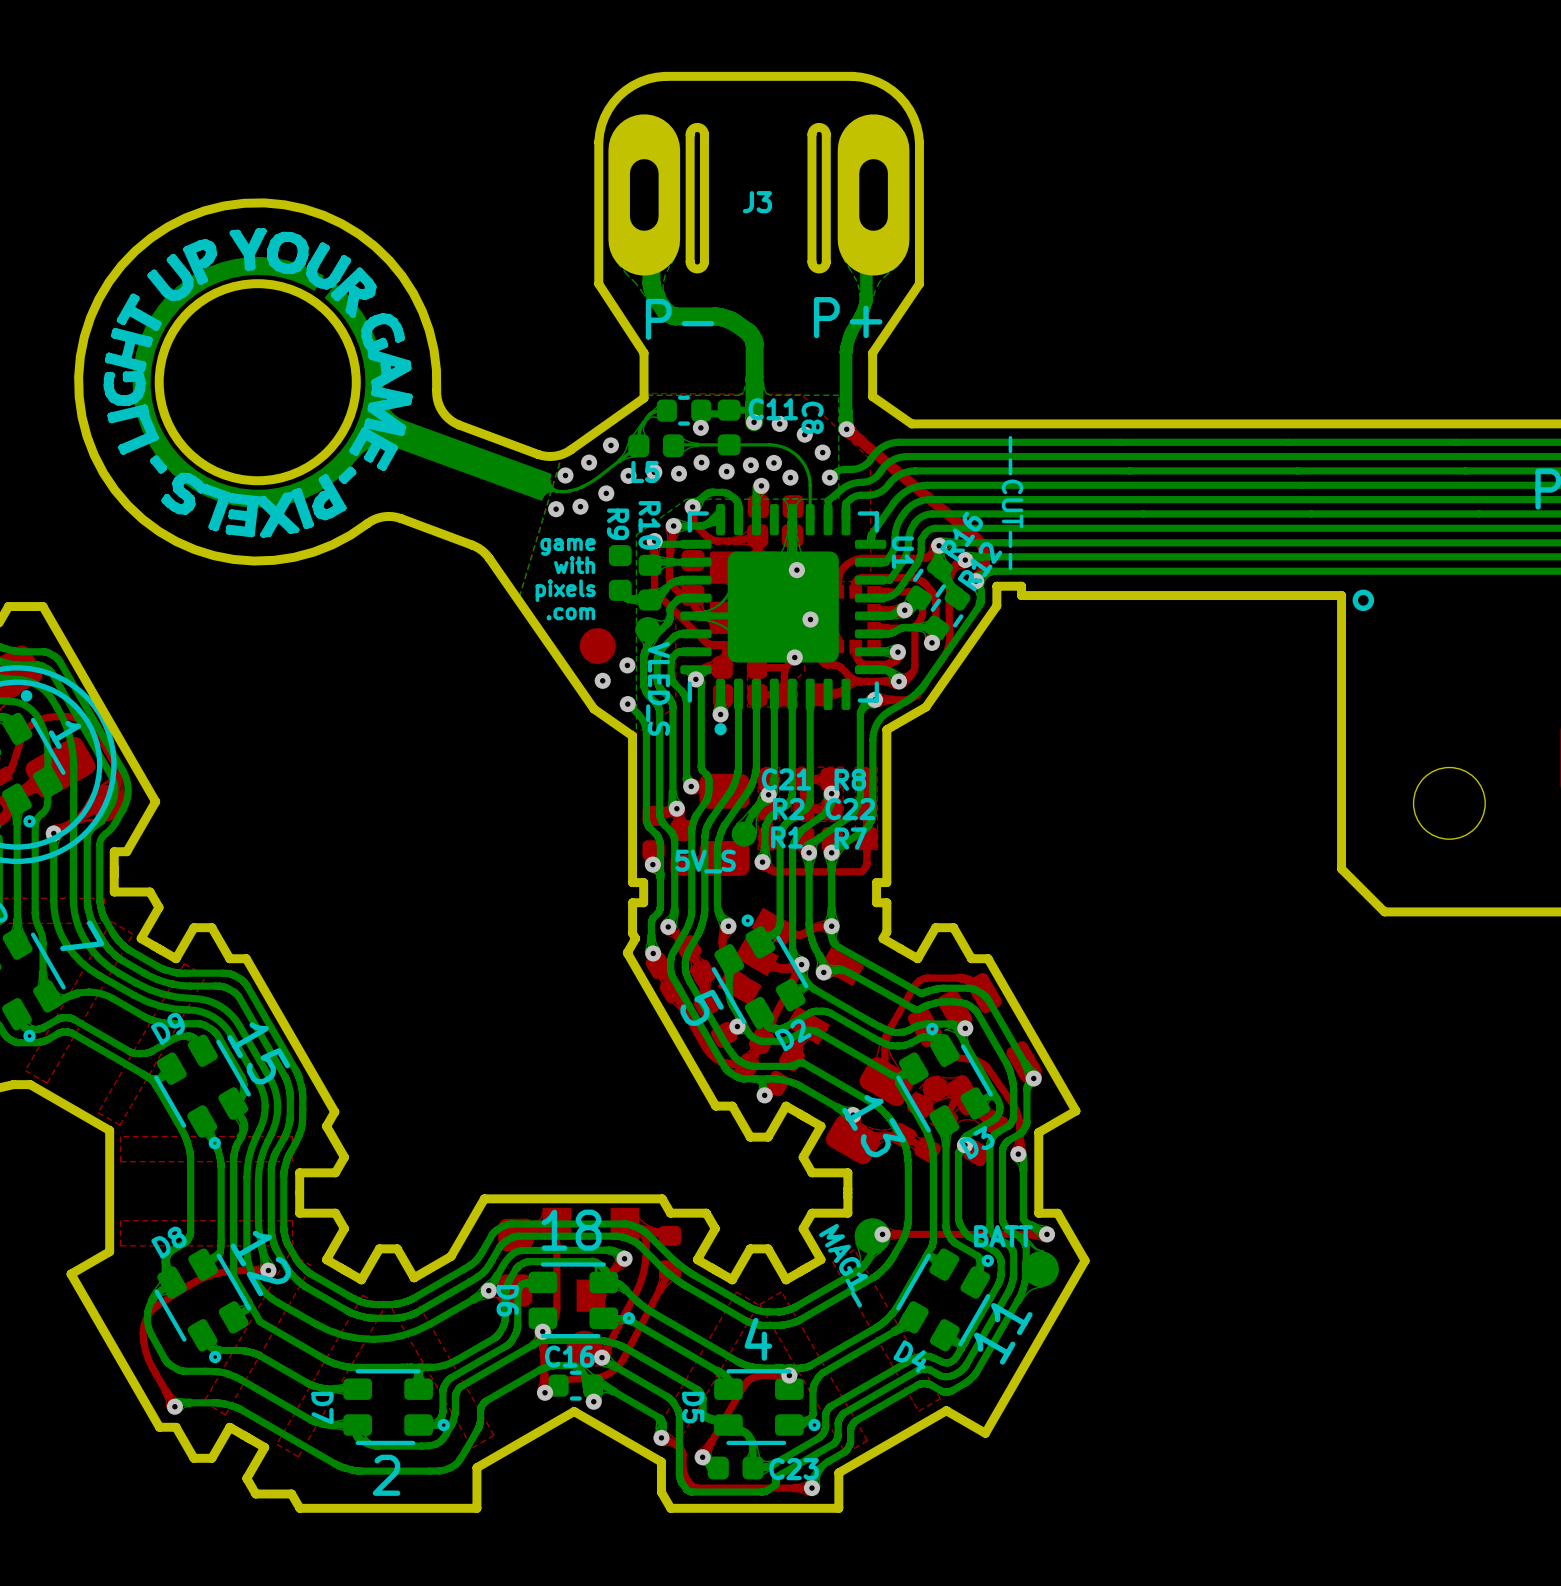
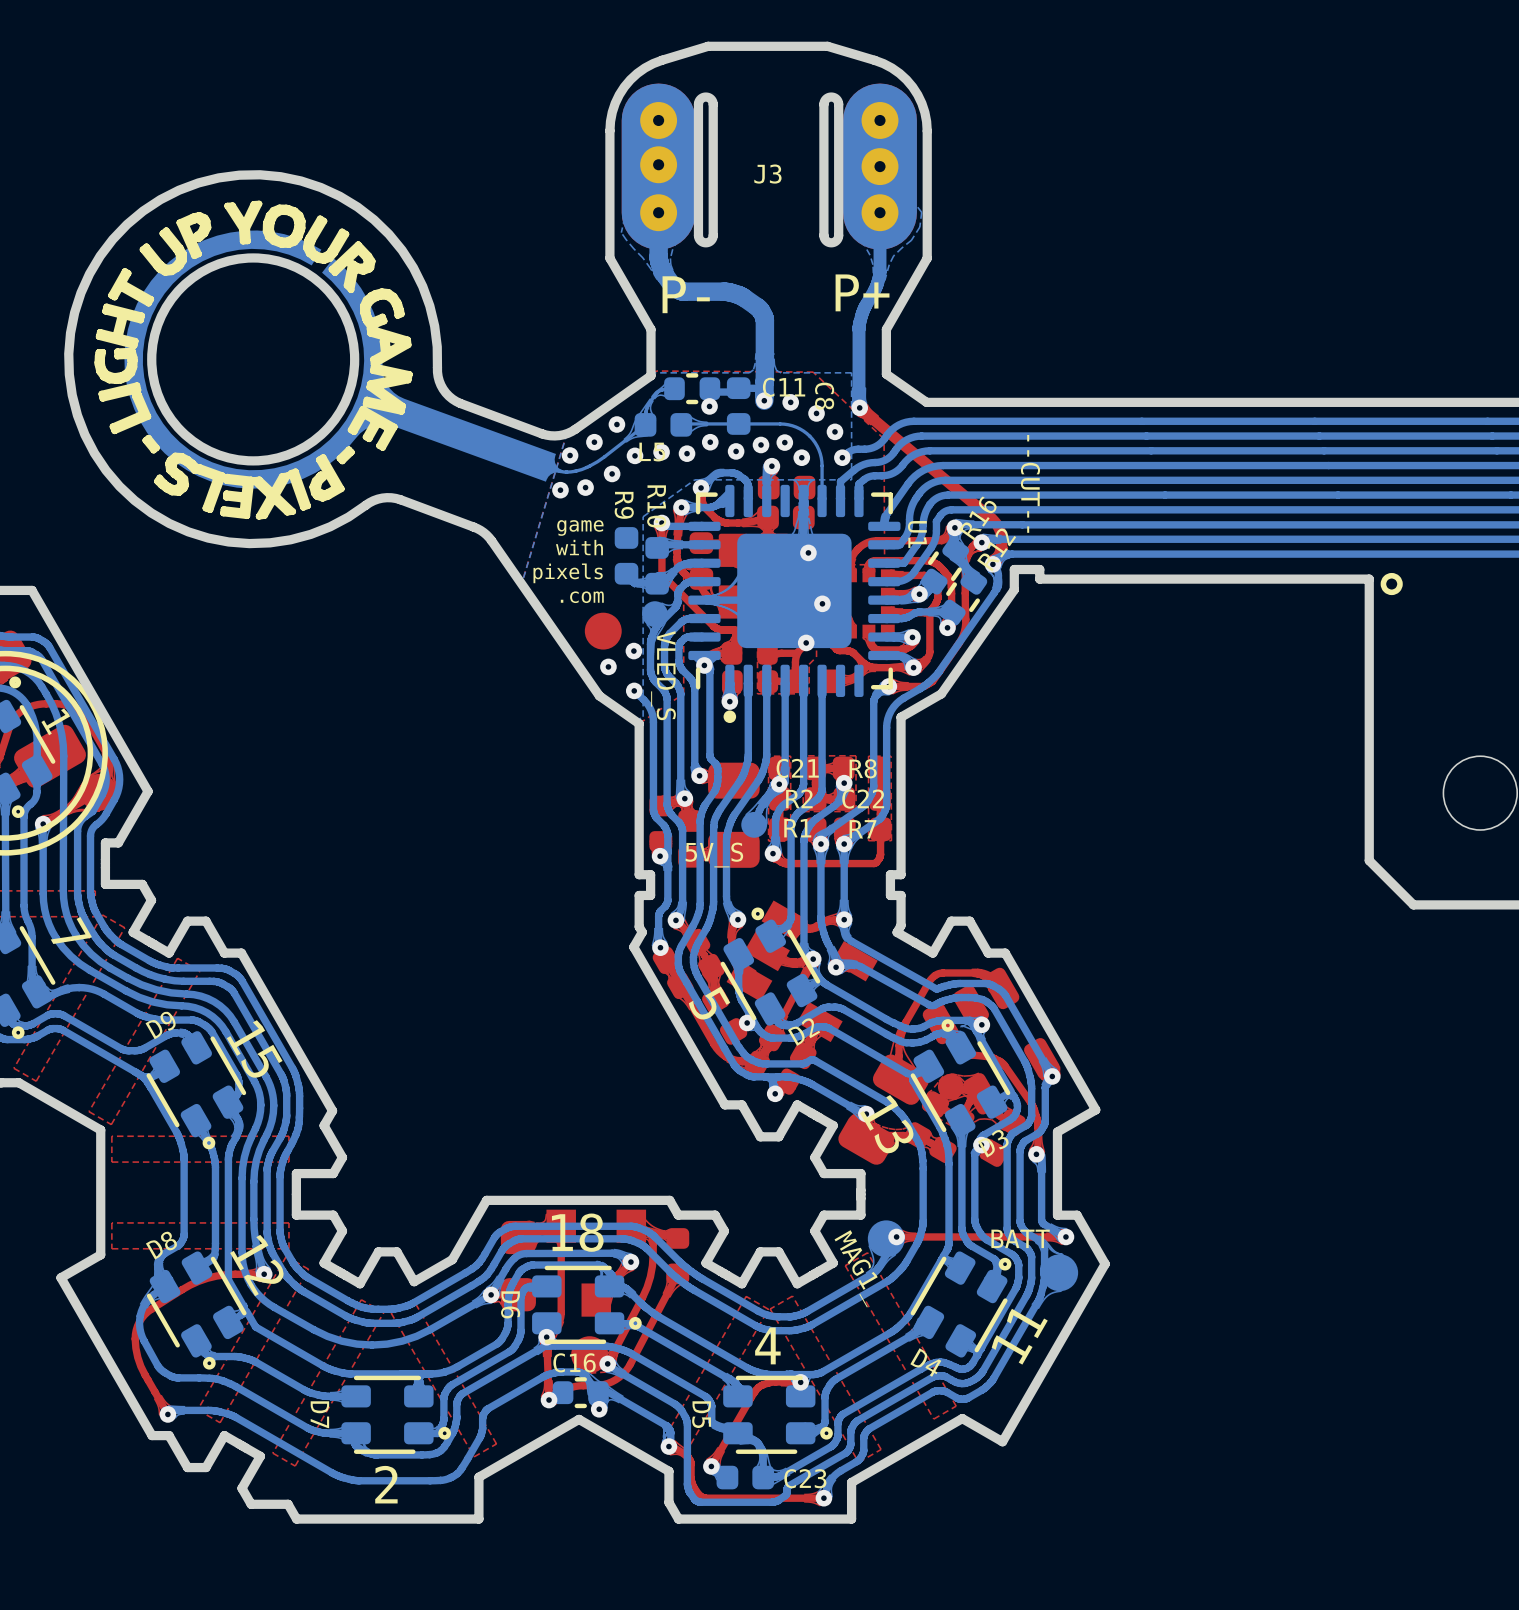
J3 footprint: [608, 114, 910, 276] -> [621, 83, 917, 250]
board edge: (872, 353) (919, 283) (919, 142) (913, 117) (899, 96) (878, 82) (853, 76) (656, 77) (632, 85) (613, 102) (601, 125) (598, 142) (598, 283) (644, 353) -> (886, 329) (927, 258) (927, 131) (924, 112) (912, 87) (891, 68) (874, 60) (827, 46) (708, 46) (661, 60) (644, 68) (630, 79) (619, 94) (612, 112) (609, 130) (609, 258) (650, 329)

